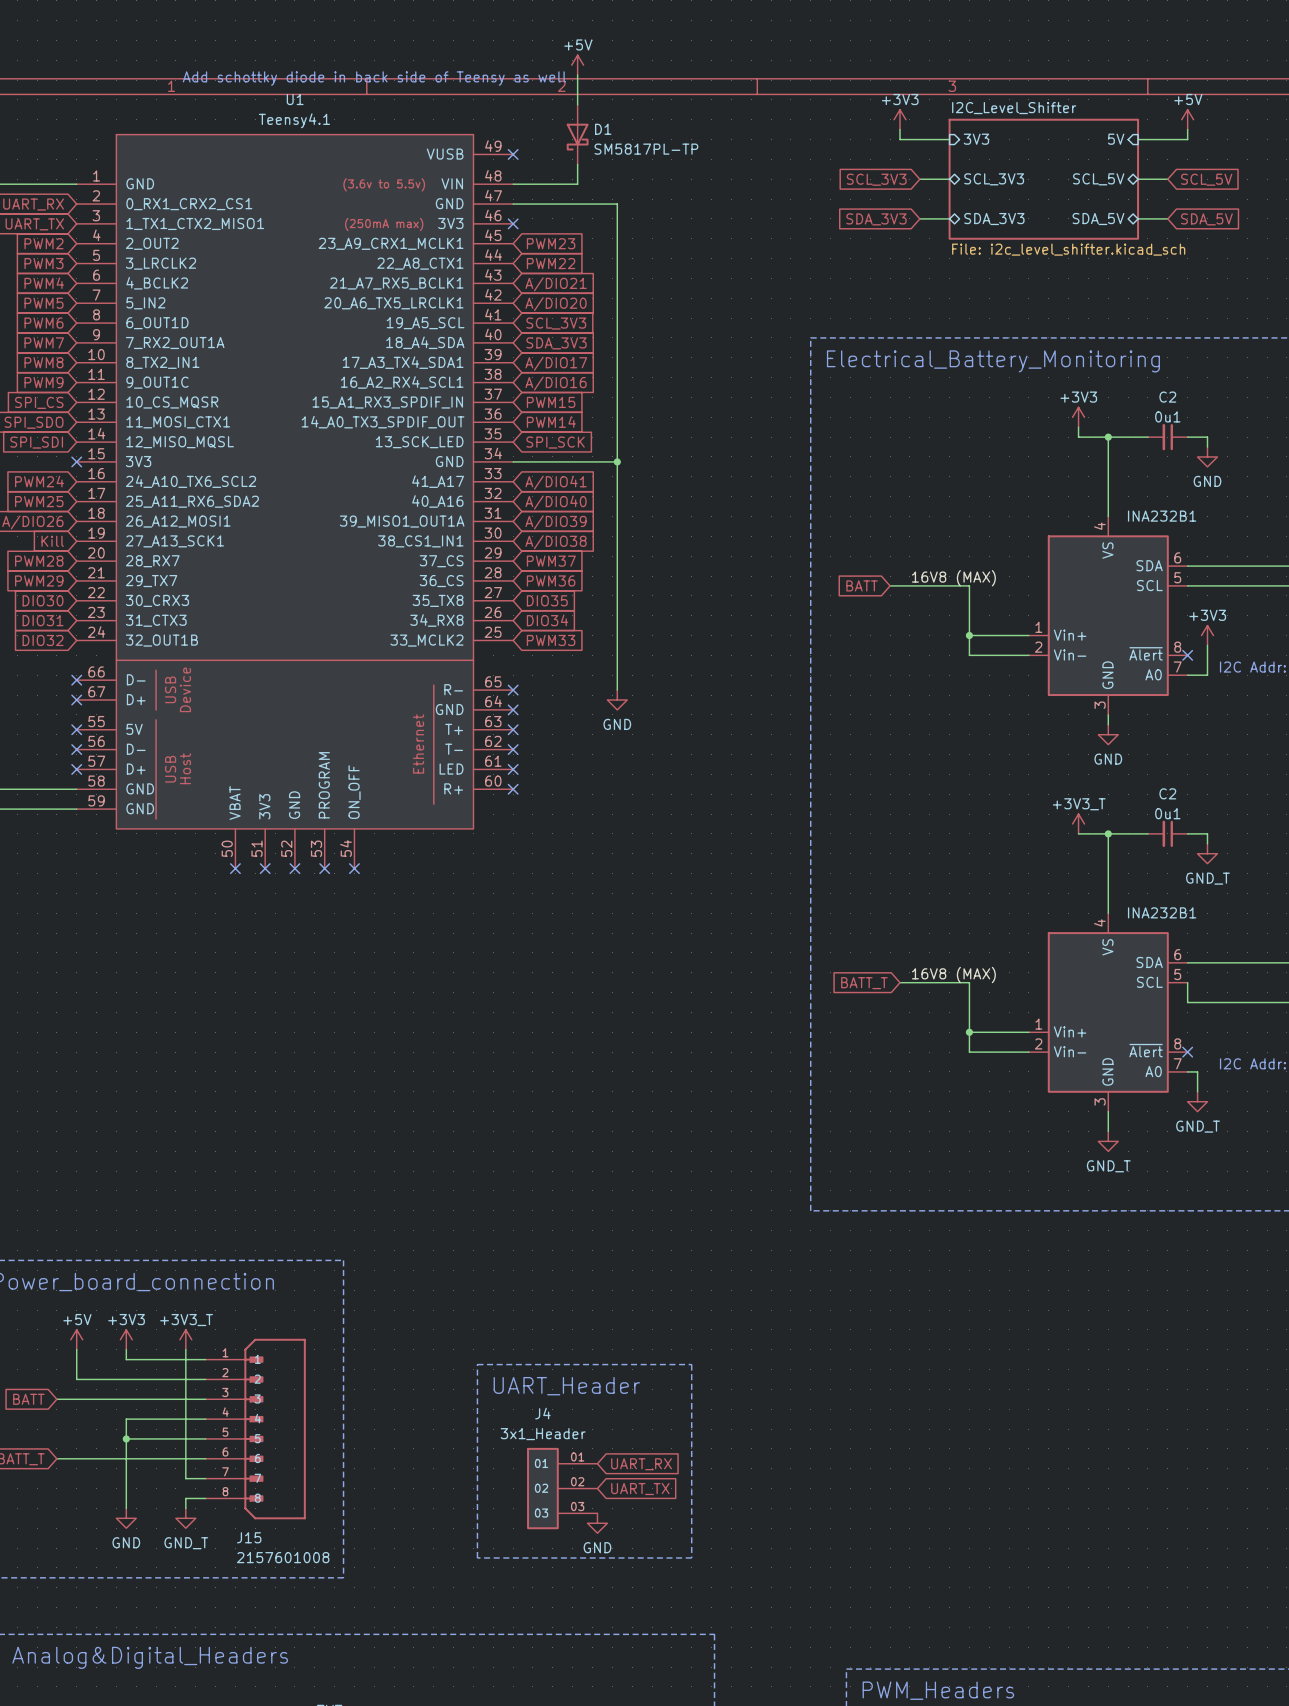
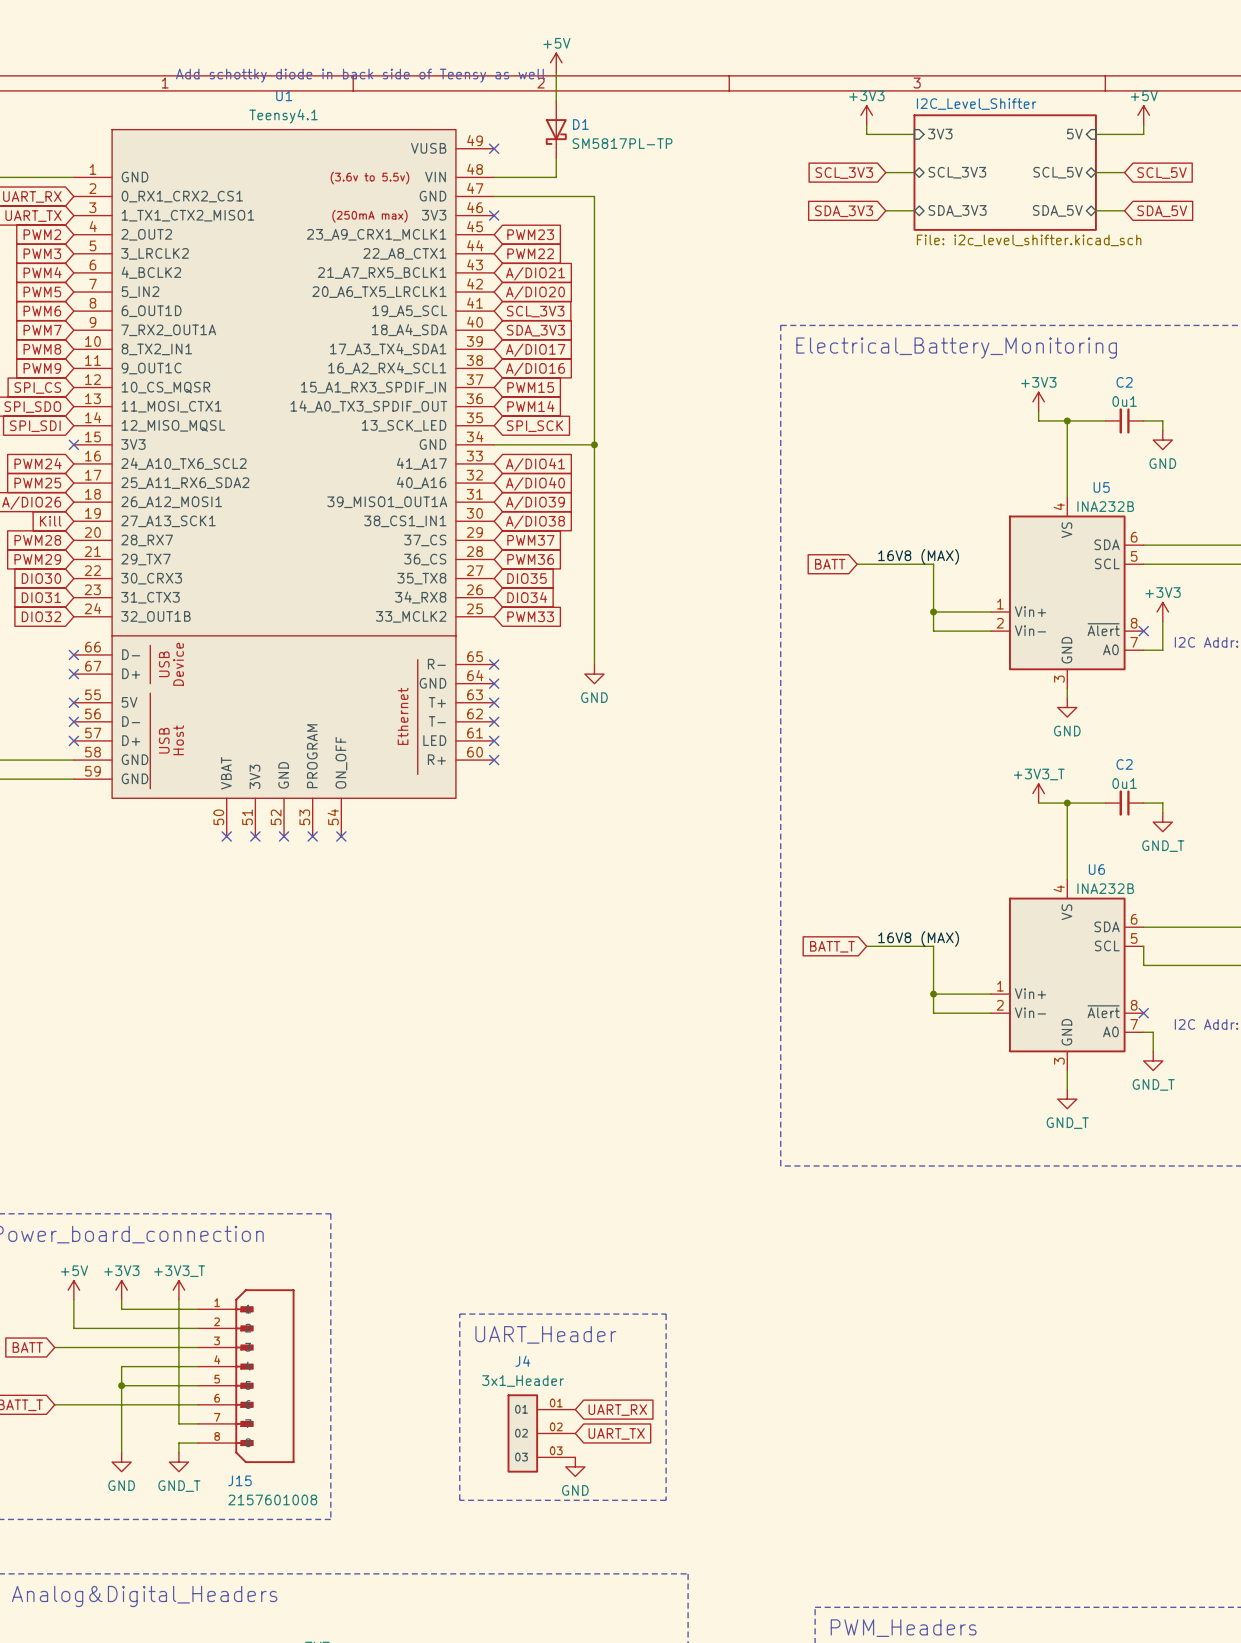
INA232B1 name: INA232B1 (1162, 516) -> U5 (1101, 487)
INA232B1 value: none -> INA232B (1105, 506)
INA232B1 name: INA232B1 (1162, 912) -> U6 (1096, 869)
INA232B1 value: none -> INA232B (1105, 888)

